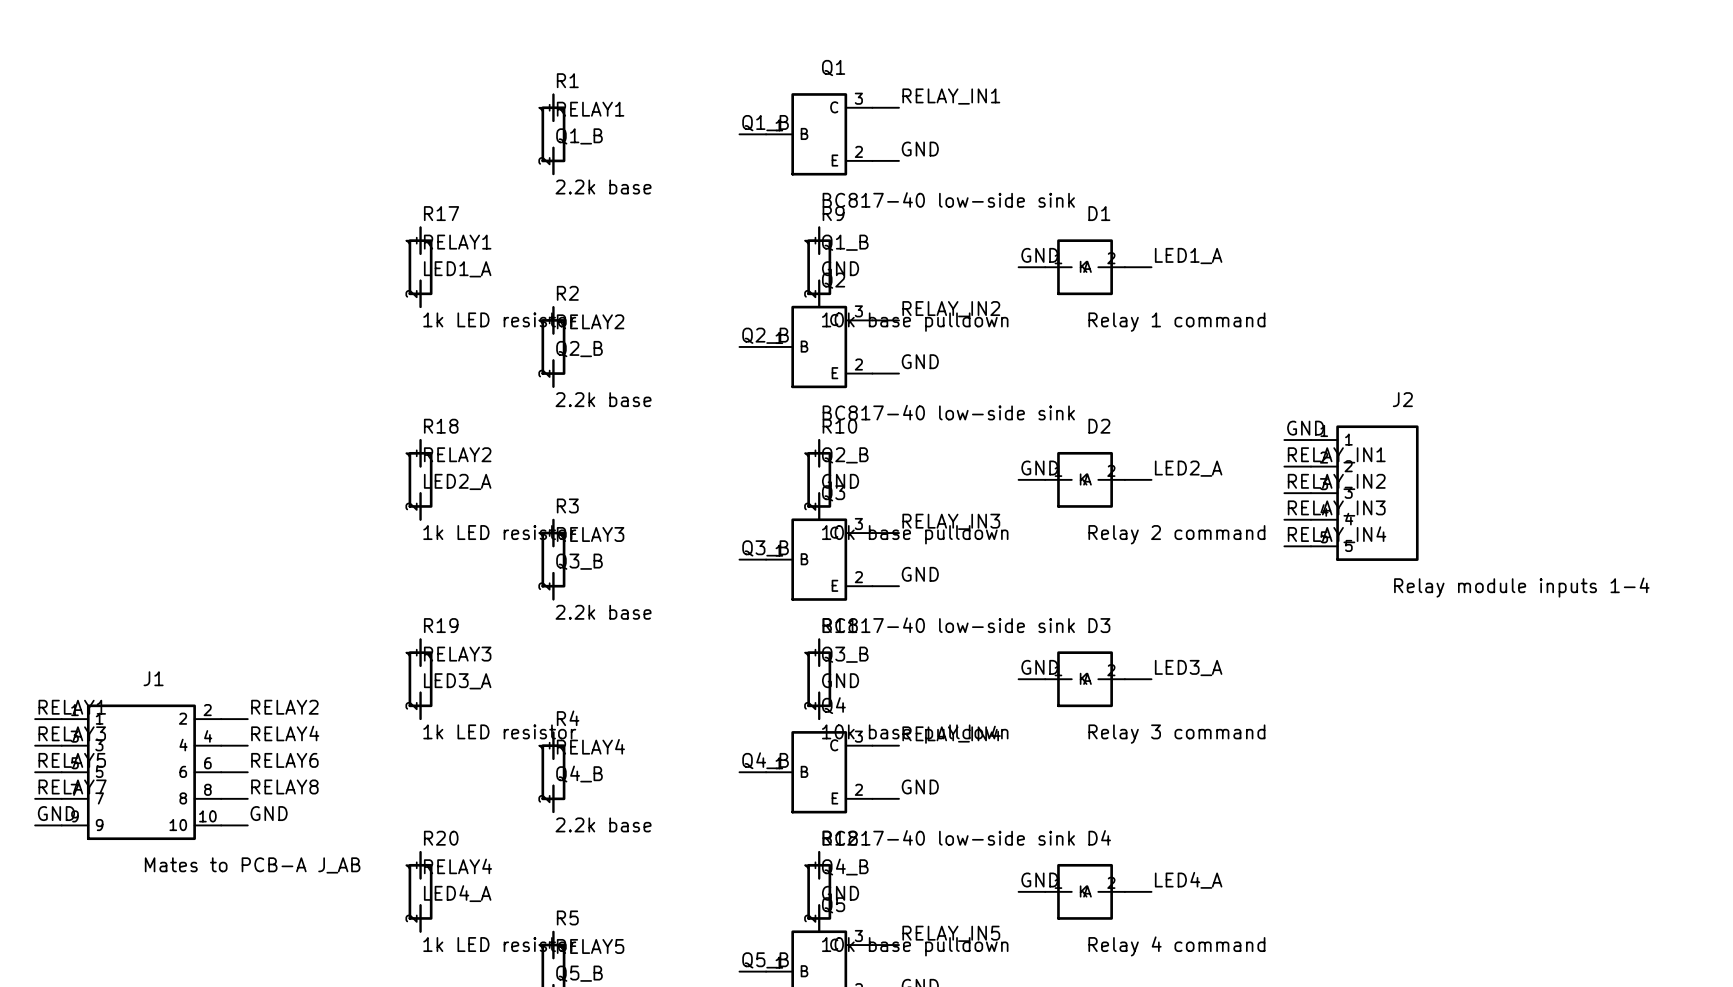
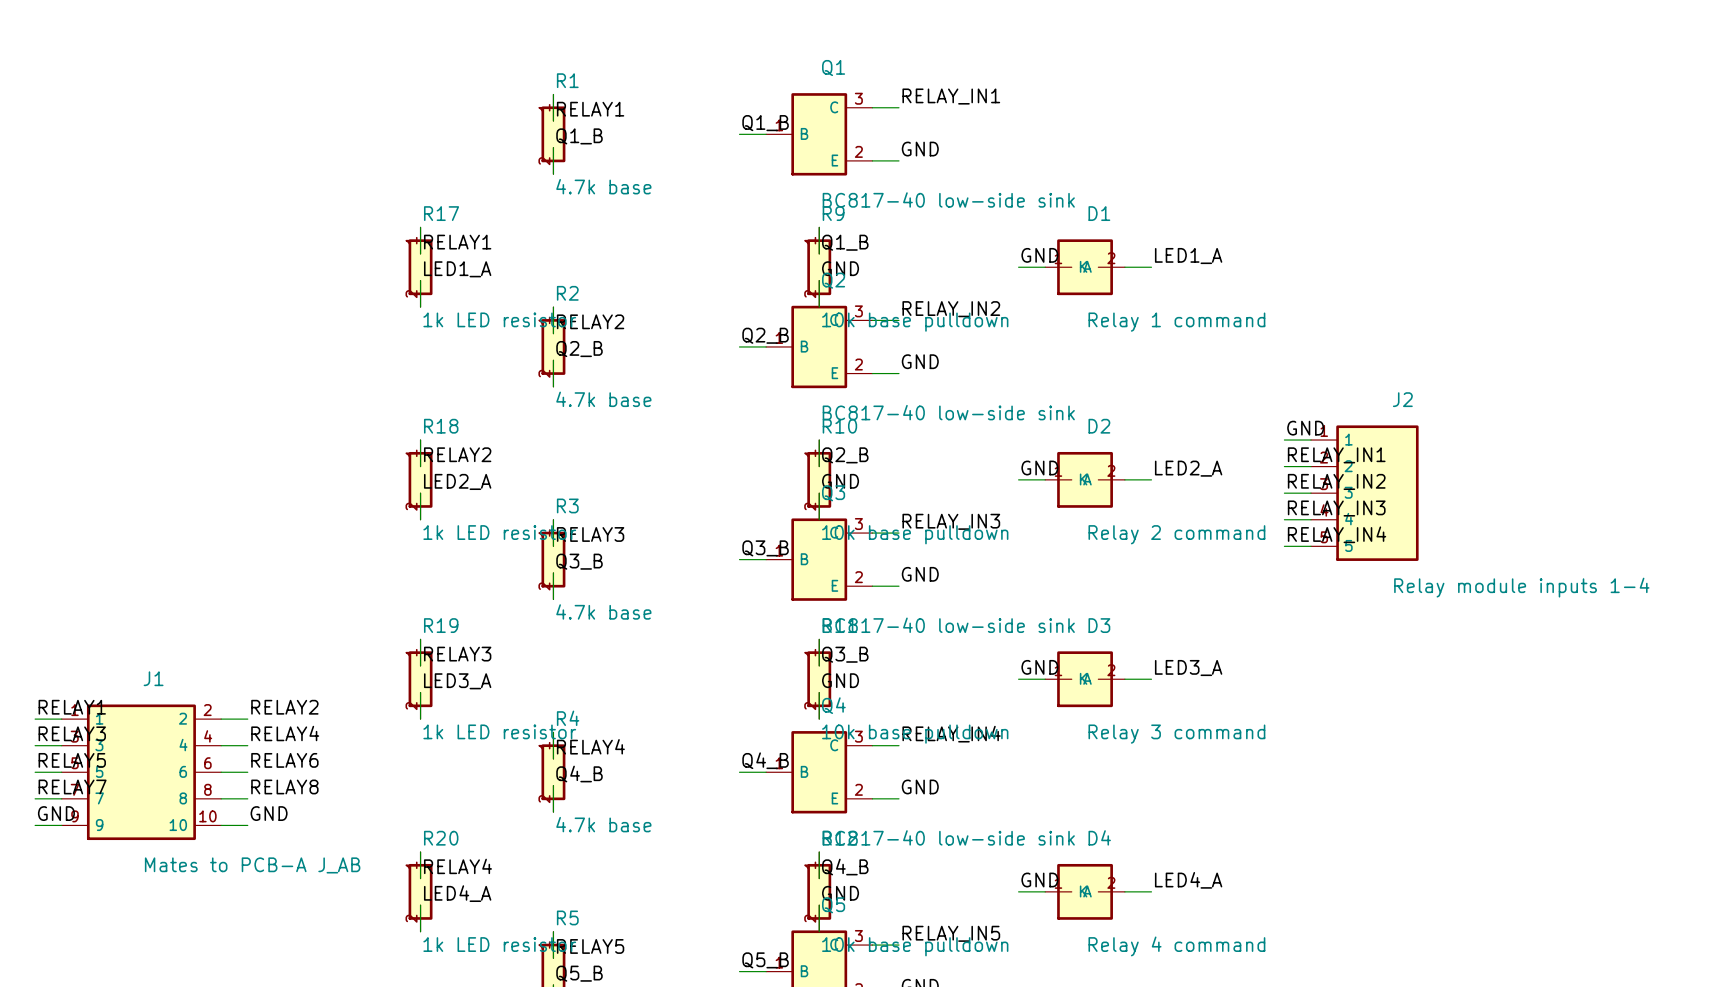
R1 value: 2.2k base (603, 187) -> 4.7k base (603, 186)
R2 value: 2.2k base (603, 399) -> 4.7k base (603, 399)
R3 value: 2.2k base (603, 612) -> 4.7k base (603, 611)
R4 value: 2.2k base (603, 824) -> 4.7k base (603, 824)

